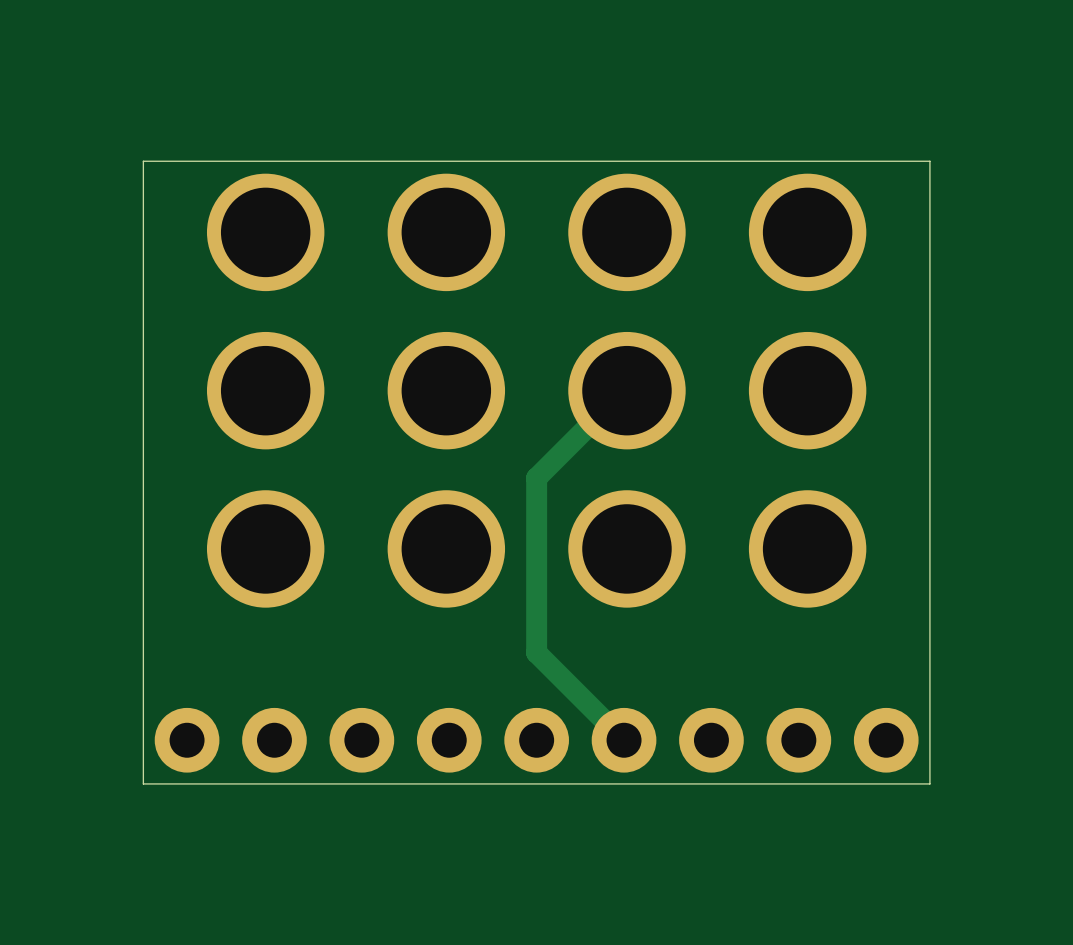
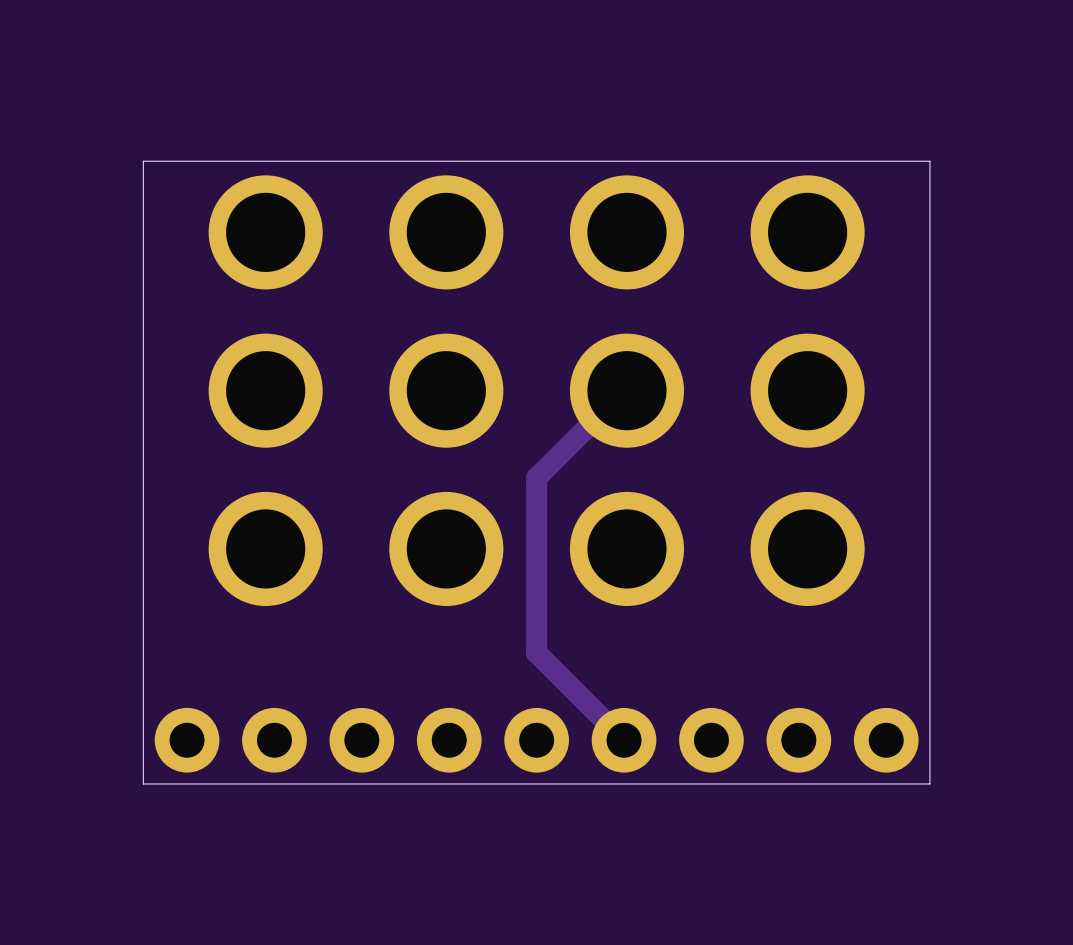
part footprint: [206, 173, 867, 608] -> [208, 175, 865, 606]

